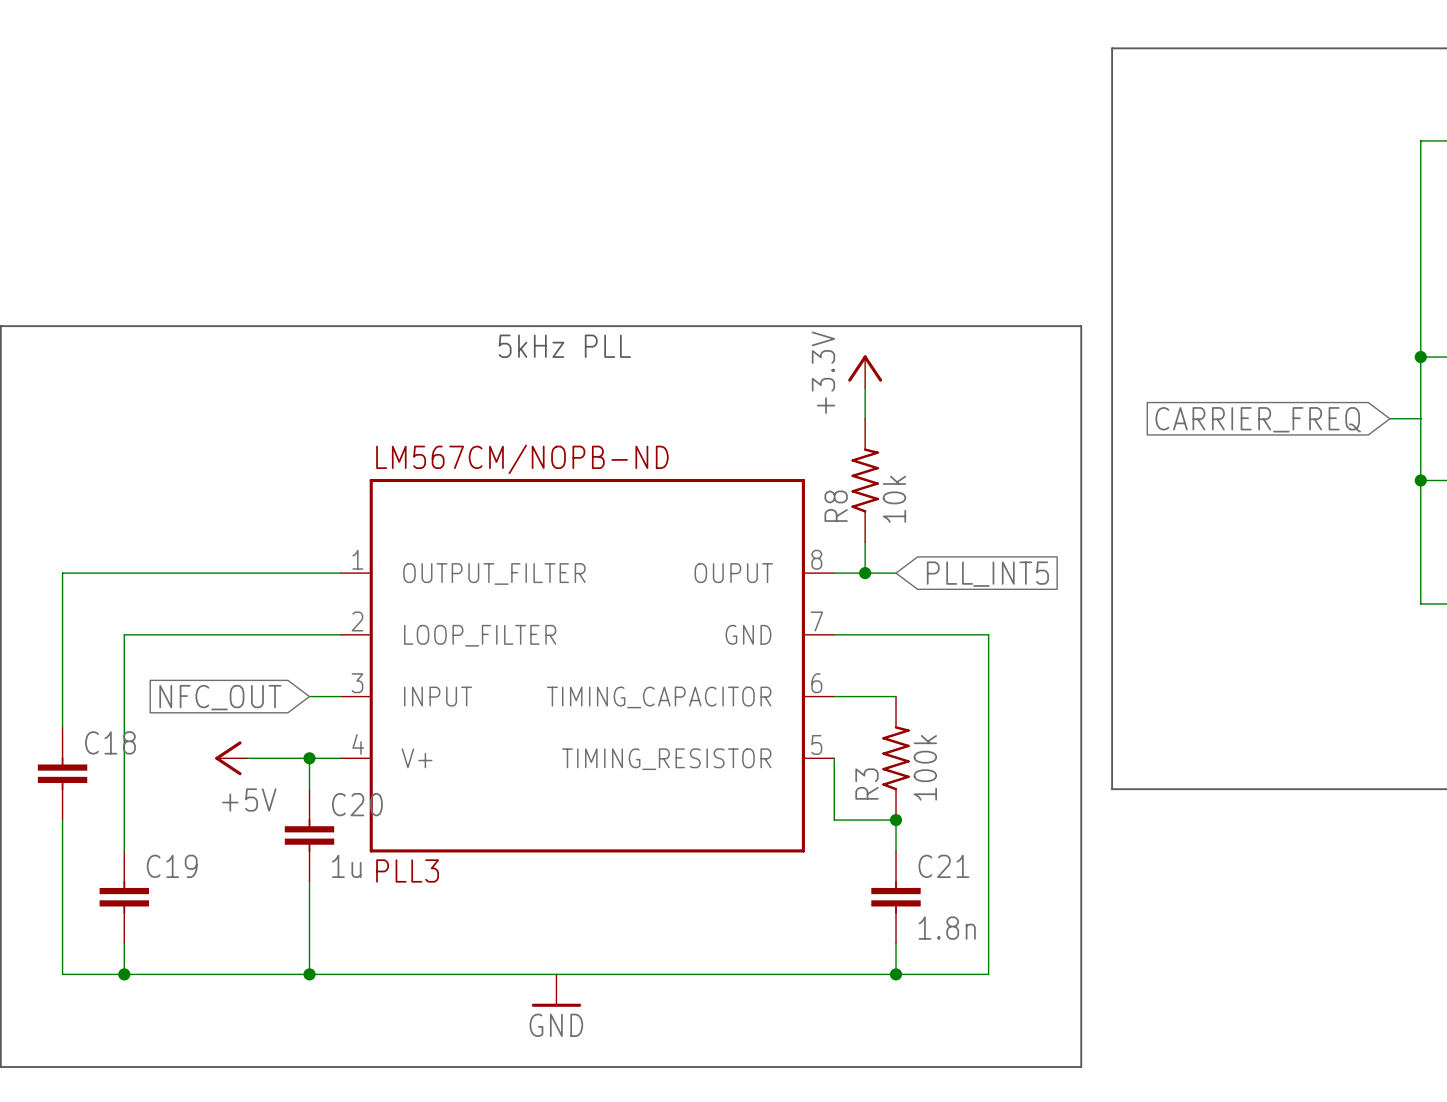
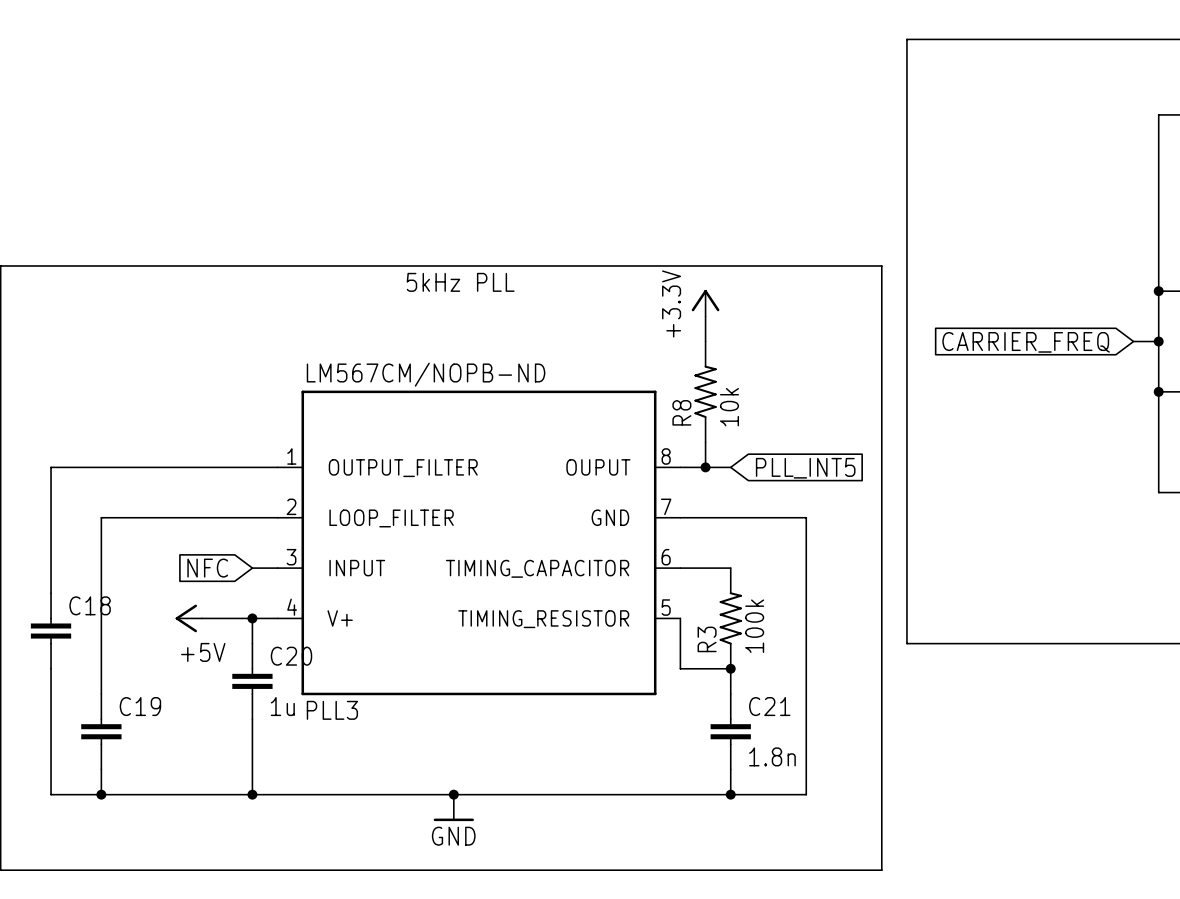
junction: none -> (1158, 341)
global label: NFC_OUT (220, 697) -> NFC (207, 568)
junction: none -> (453, 794)

